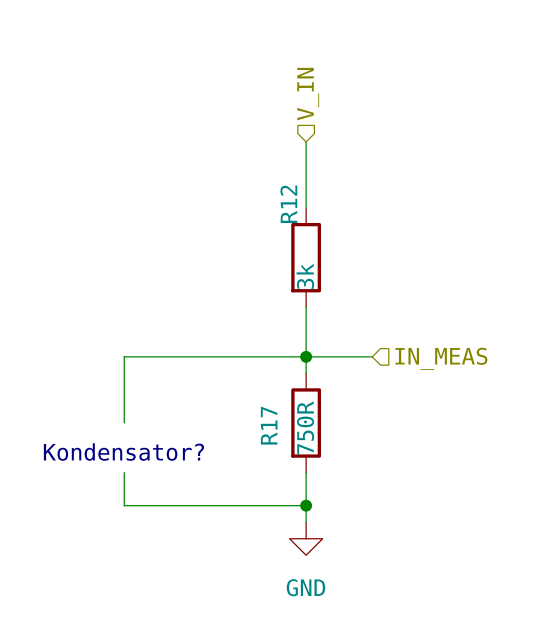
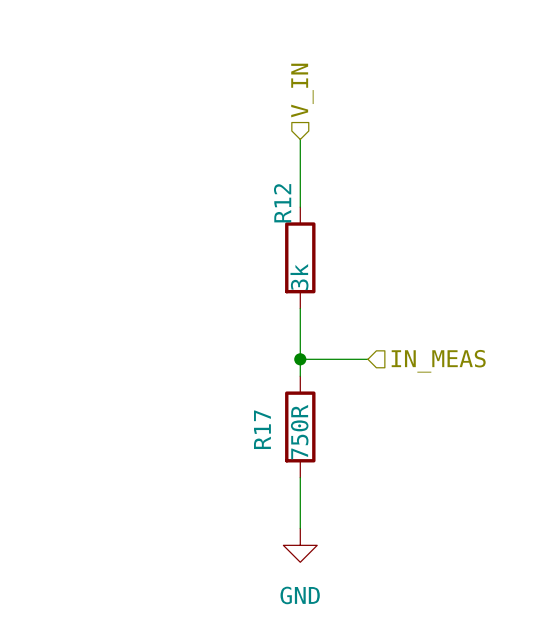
wire: (306, 356) (124, 356) (124, 423) -> none
text: Kondensator? (123, 452) -> none
wire: (124, 472) (124, 505) (306, 505) -> none
junction: (306, 505) -> none

